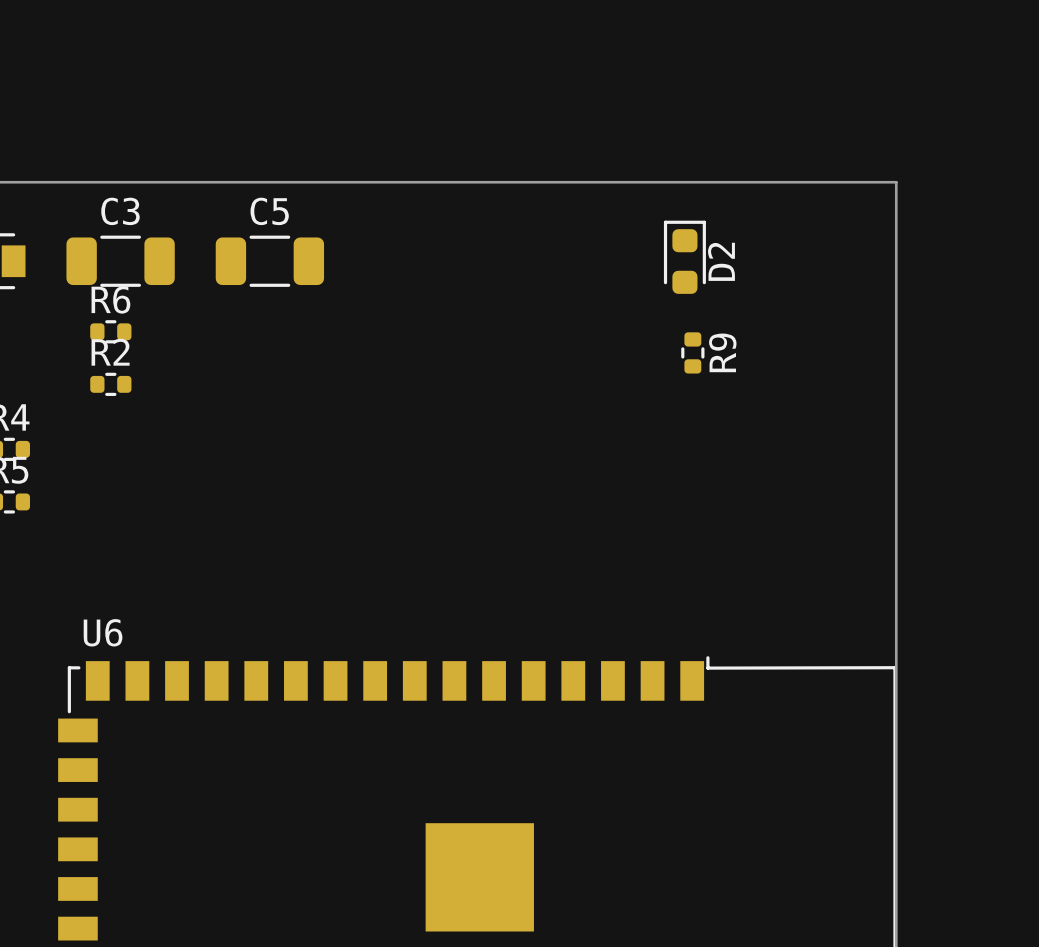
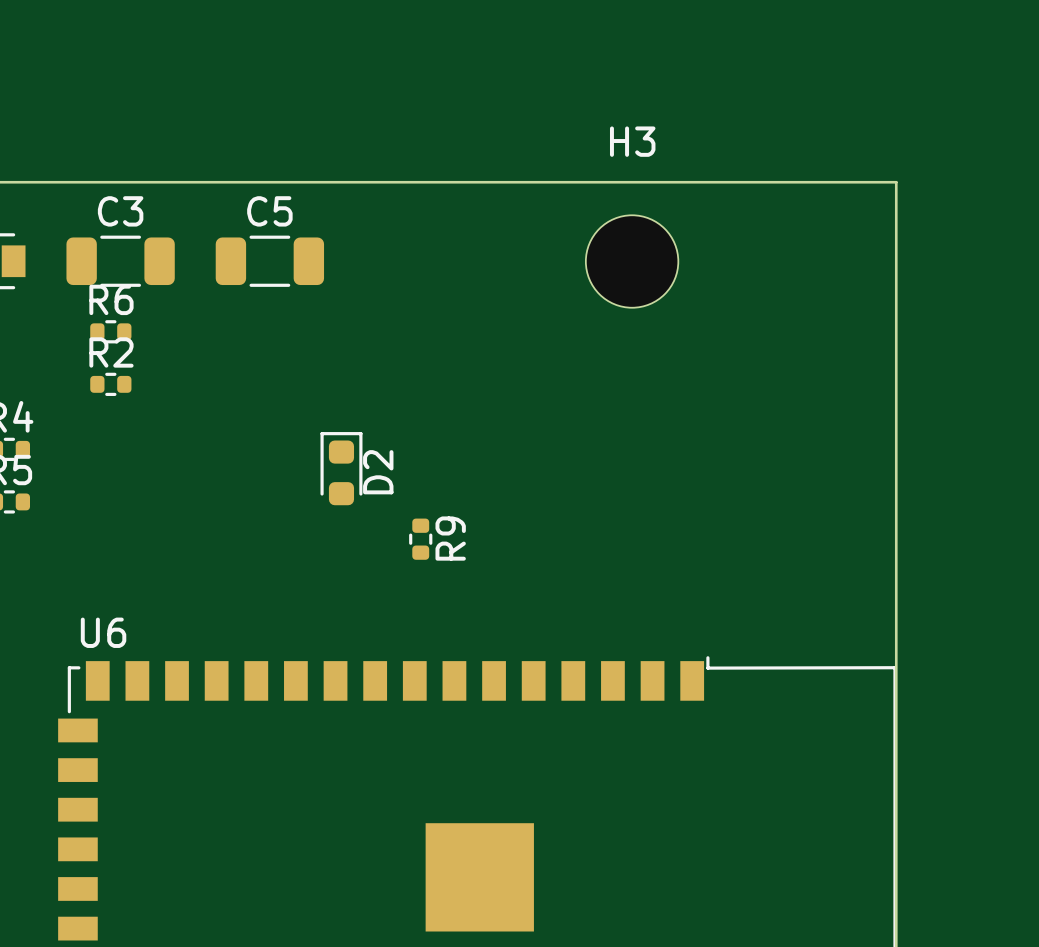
D2 position: (684, 257) -> (341, 468)
H3: none -> (632, 261)
R9 position: (692, 352) -> (420, 539)

